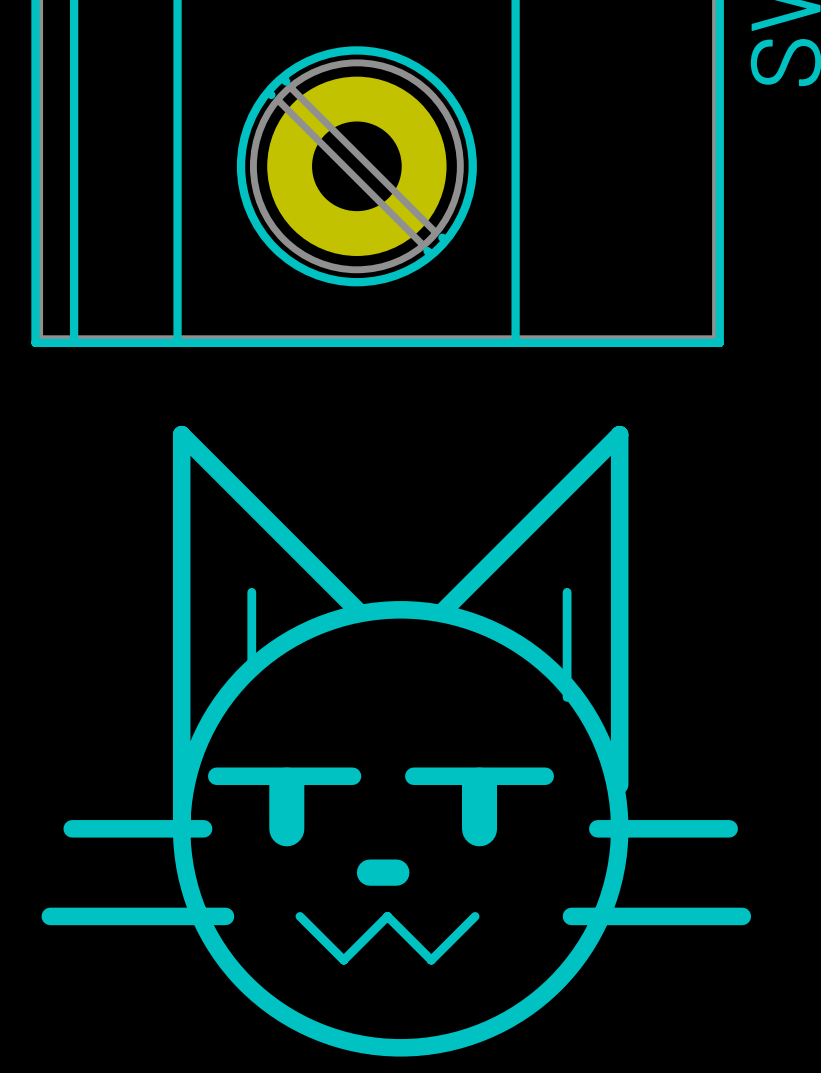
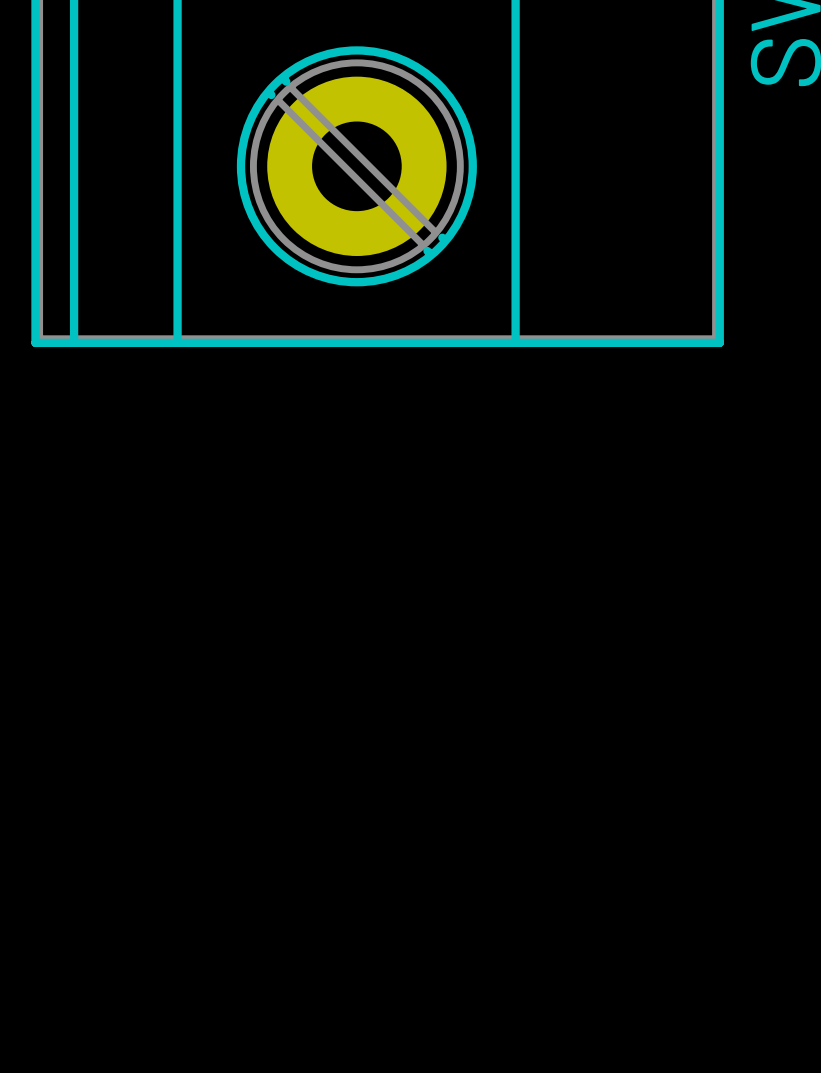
line: (251, 592) (251, 662) -> none
line: (567, 592) (567, 697) -> none
drawing: [172, 601, 629, 1057] -> none
line: (356, 609) (181, 434) (181, 828) -> none
line: (444, 609) (619, 434) (619, 785) -> none
line: (216, 776) (352, 776) -> none
line: (413, 776) (545, 776) -> none
line: (286, 785) (286, 828) -> none
line: (479, 785) (479, 828) -> none
line: (72, 828) (203, 828) -> none
line: (597, 828) (729, 828) -> none
line: (370, 872) (396, 872) -> none
line: (50, 916) (225, 916) -> none
line: (299, 916) (343, 960) (387, 916) (431, 960) (475, 916) -> none
line: (571, 916) (742, 916) -> none

